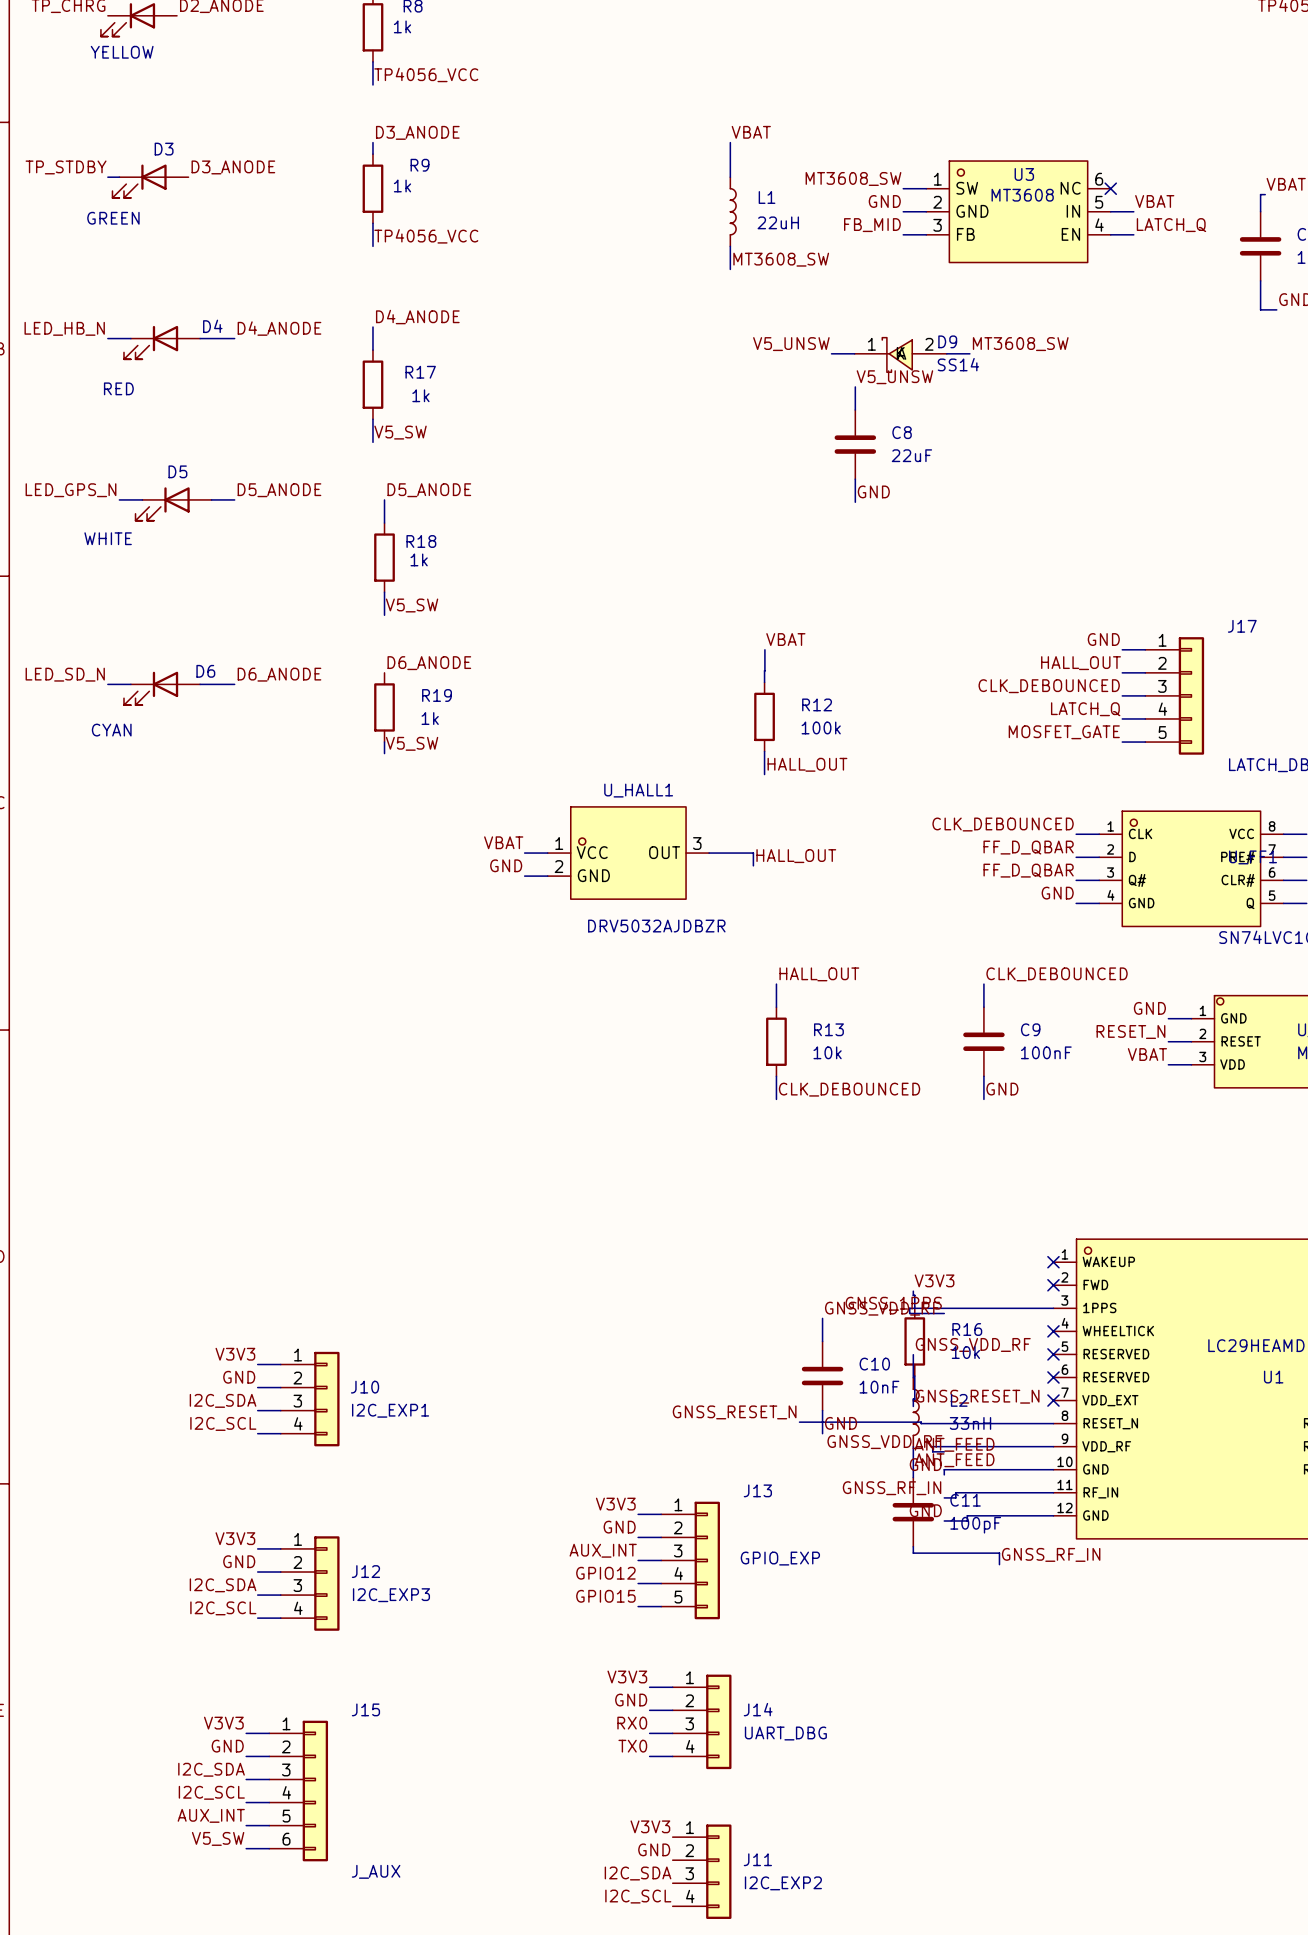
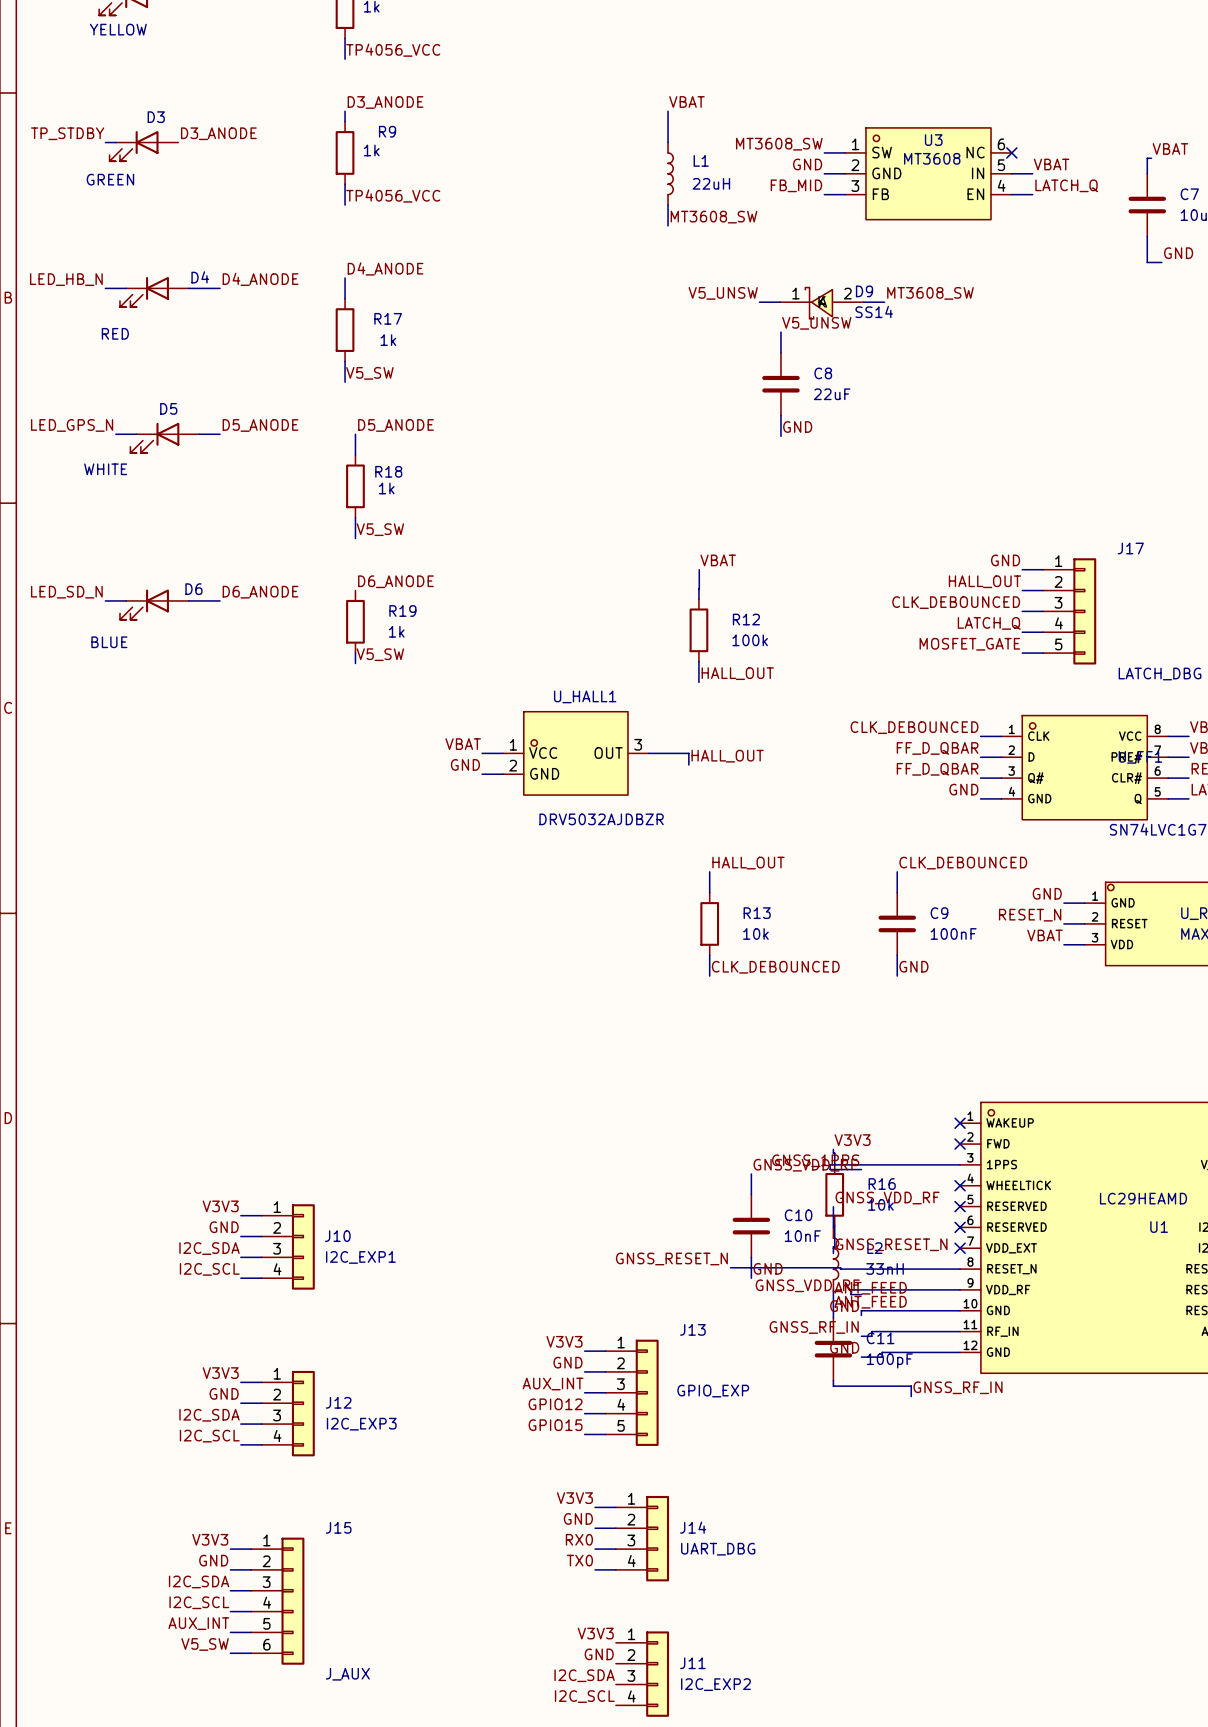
D6 value: CYAN (111, 730) -> BLUE (109, 642)

